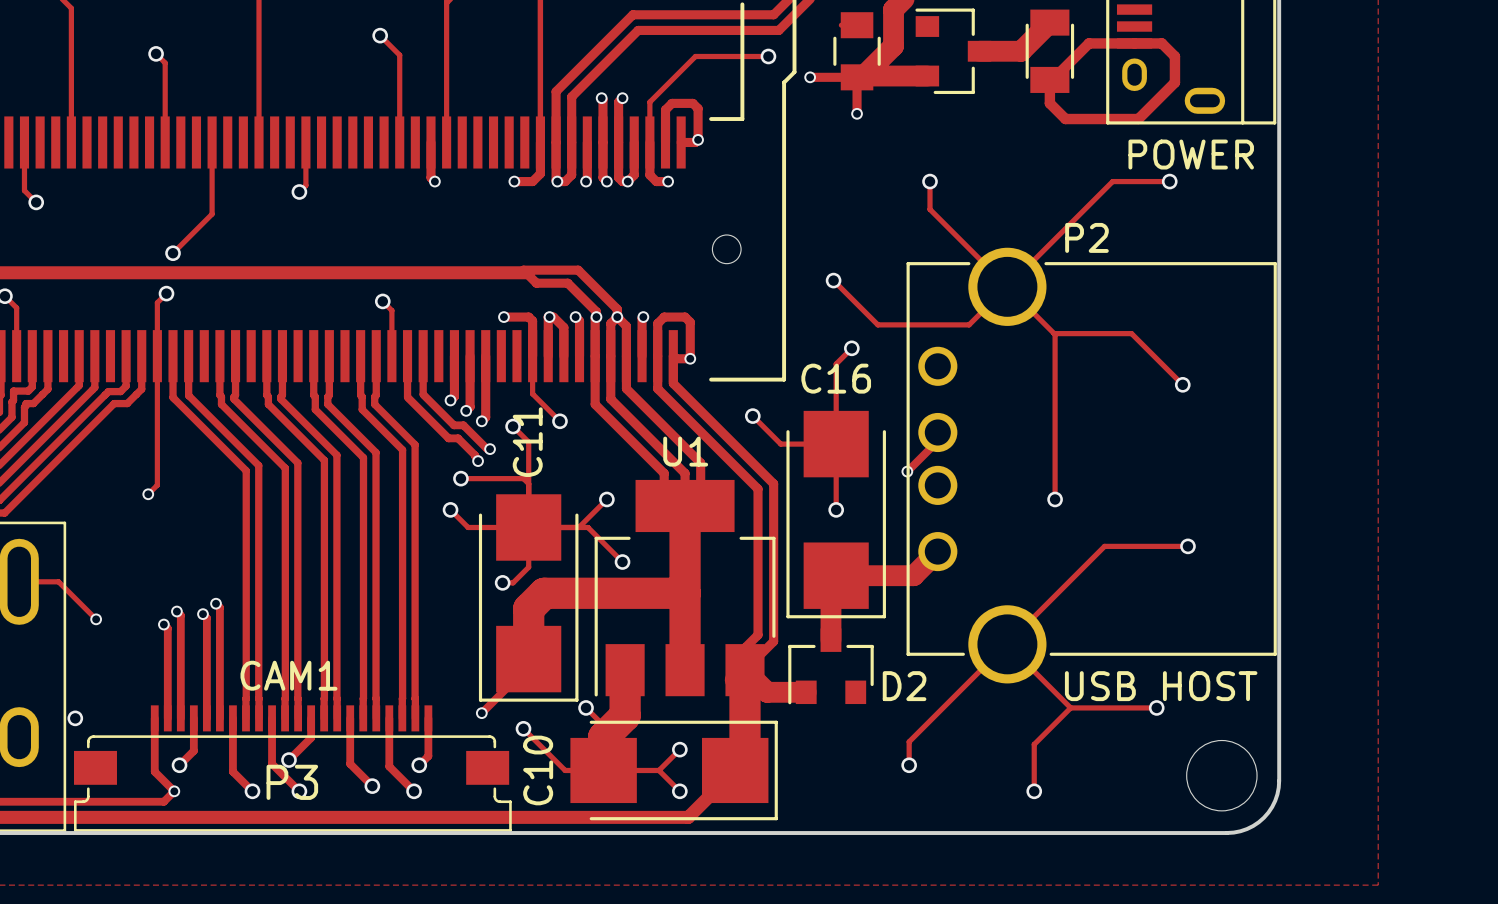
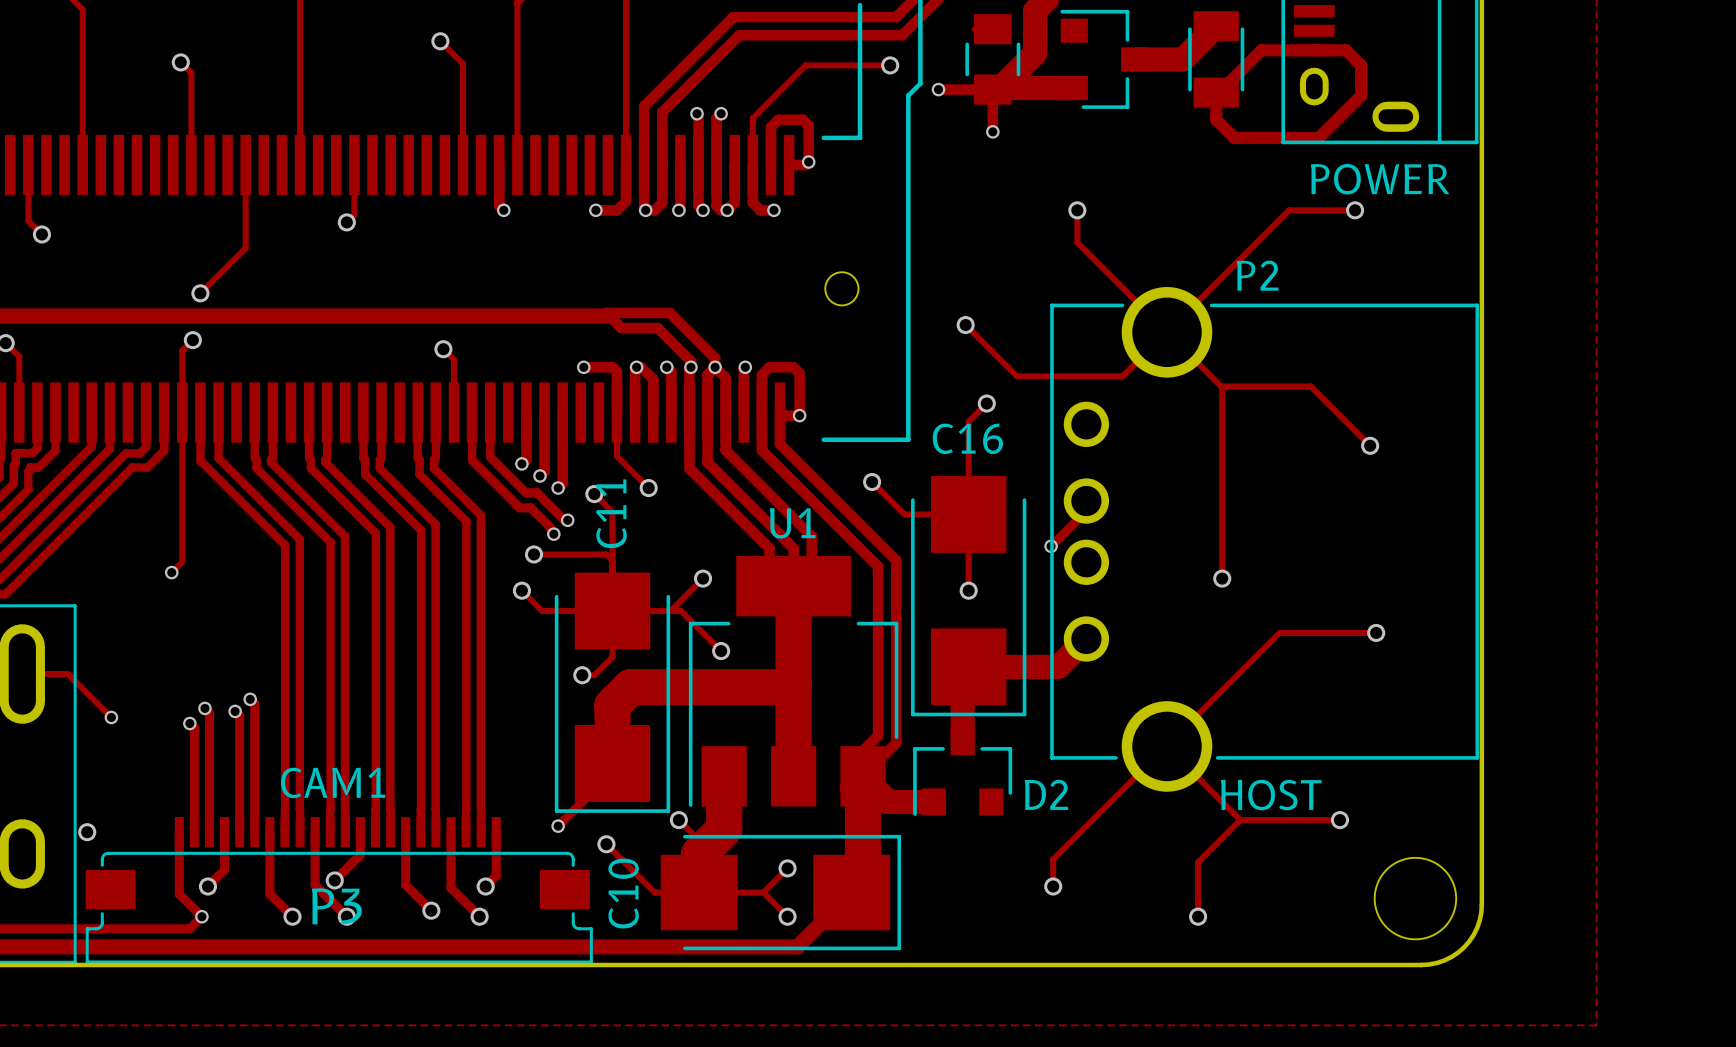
text: USB HOST (1161, 686) -> HOST (1271, 794)

